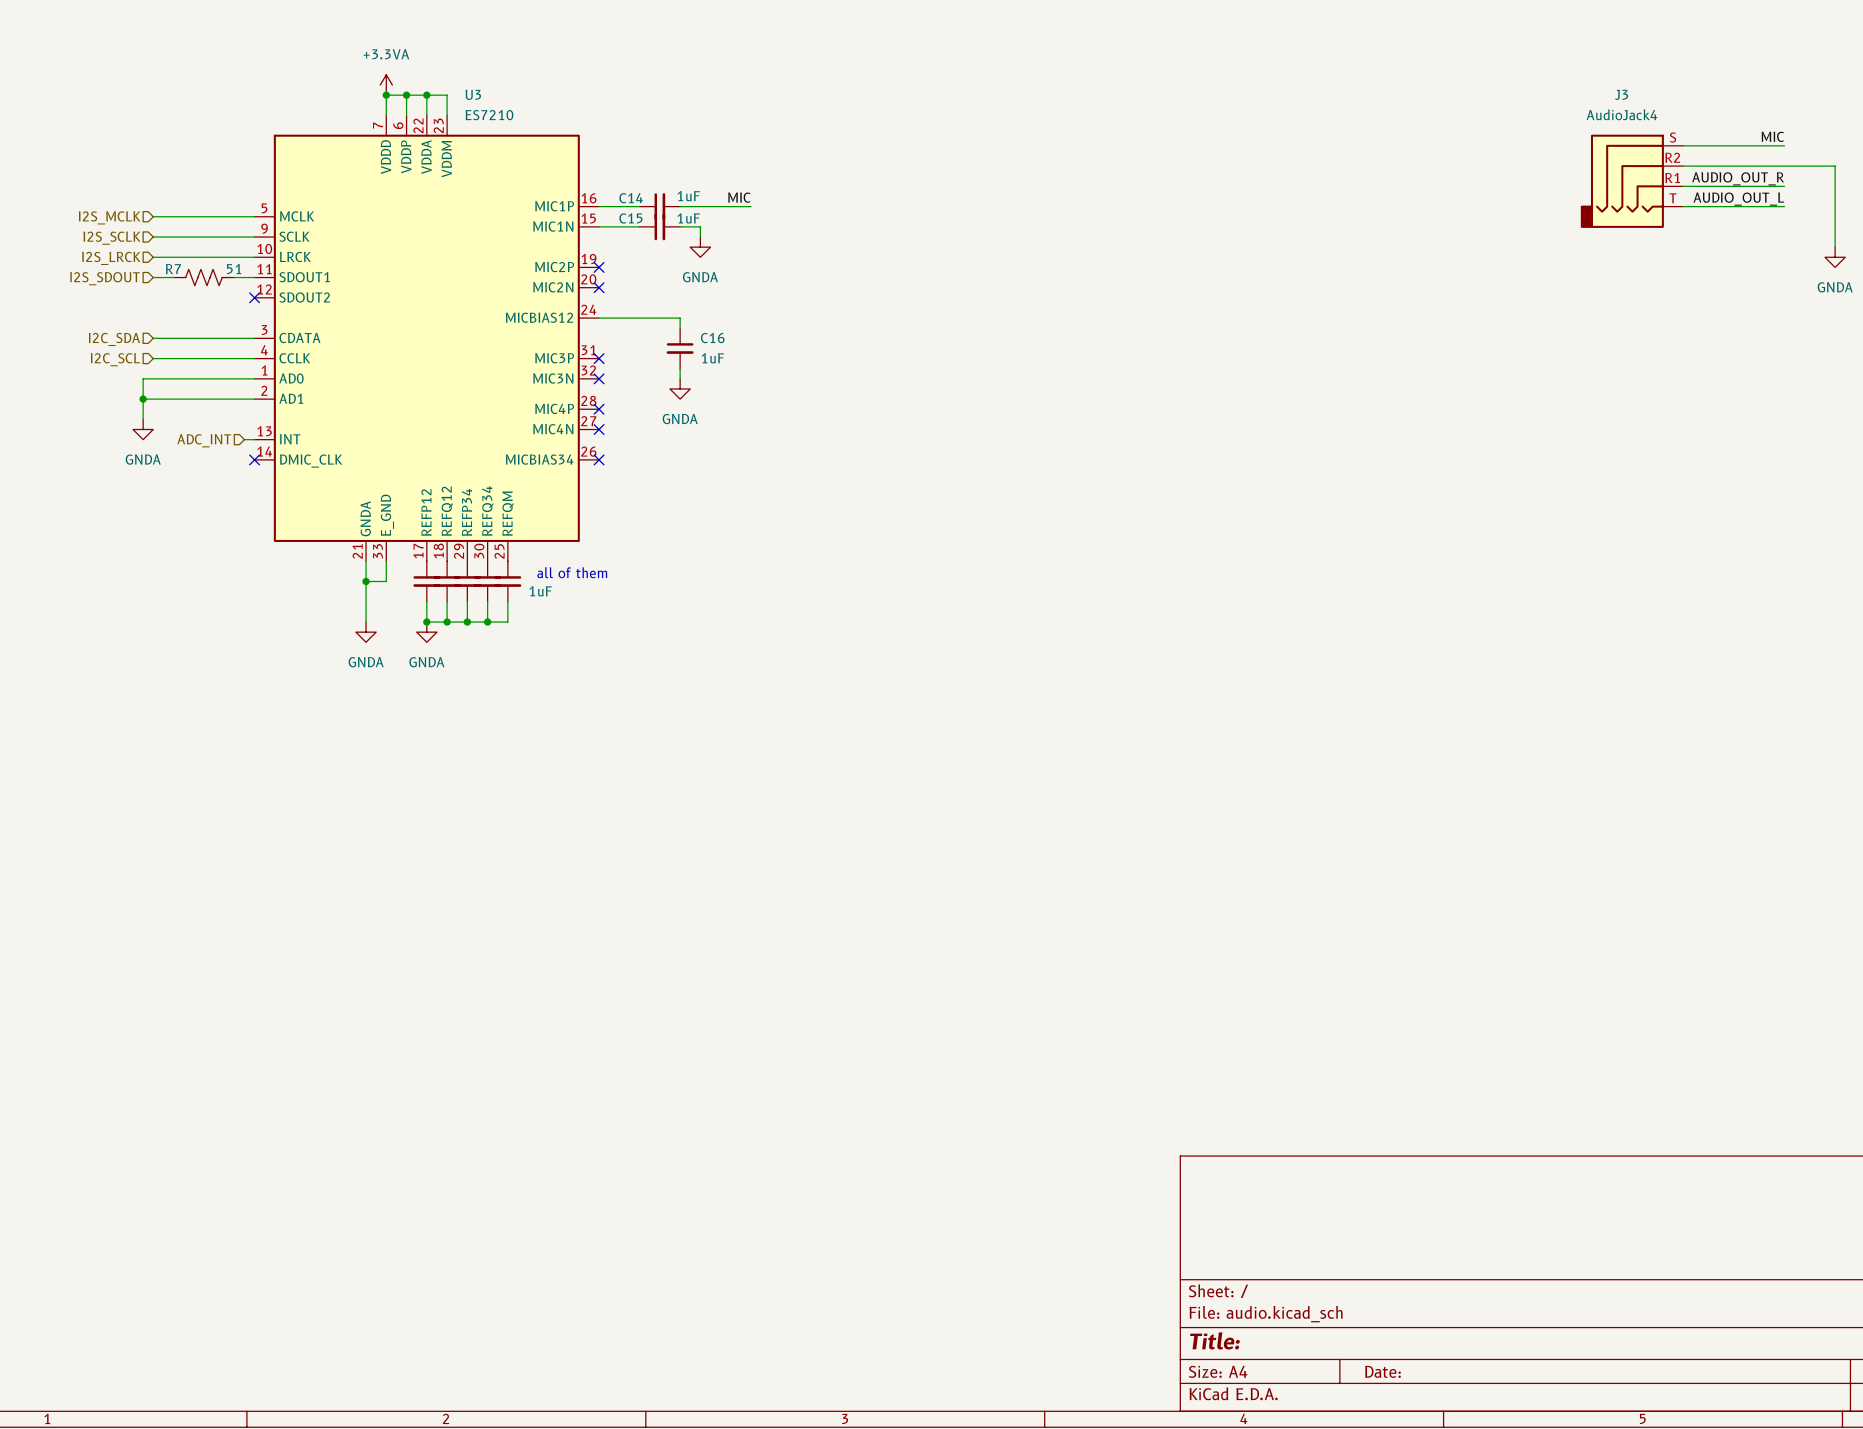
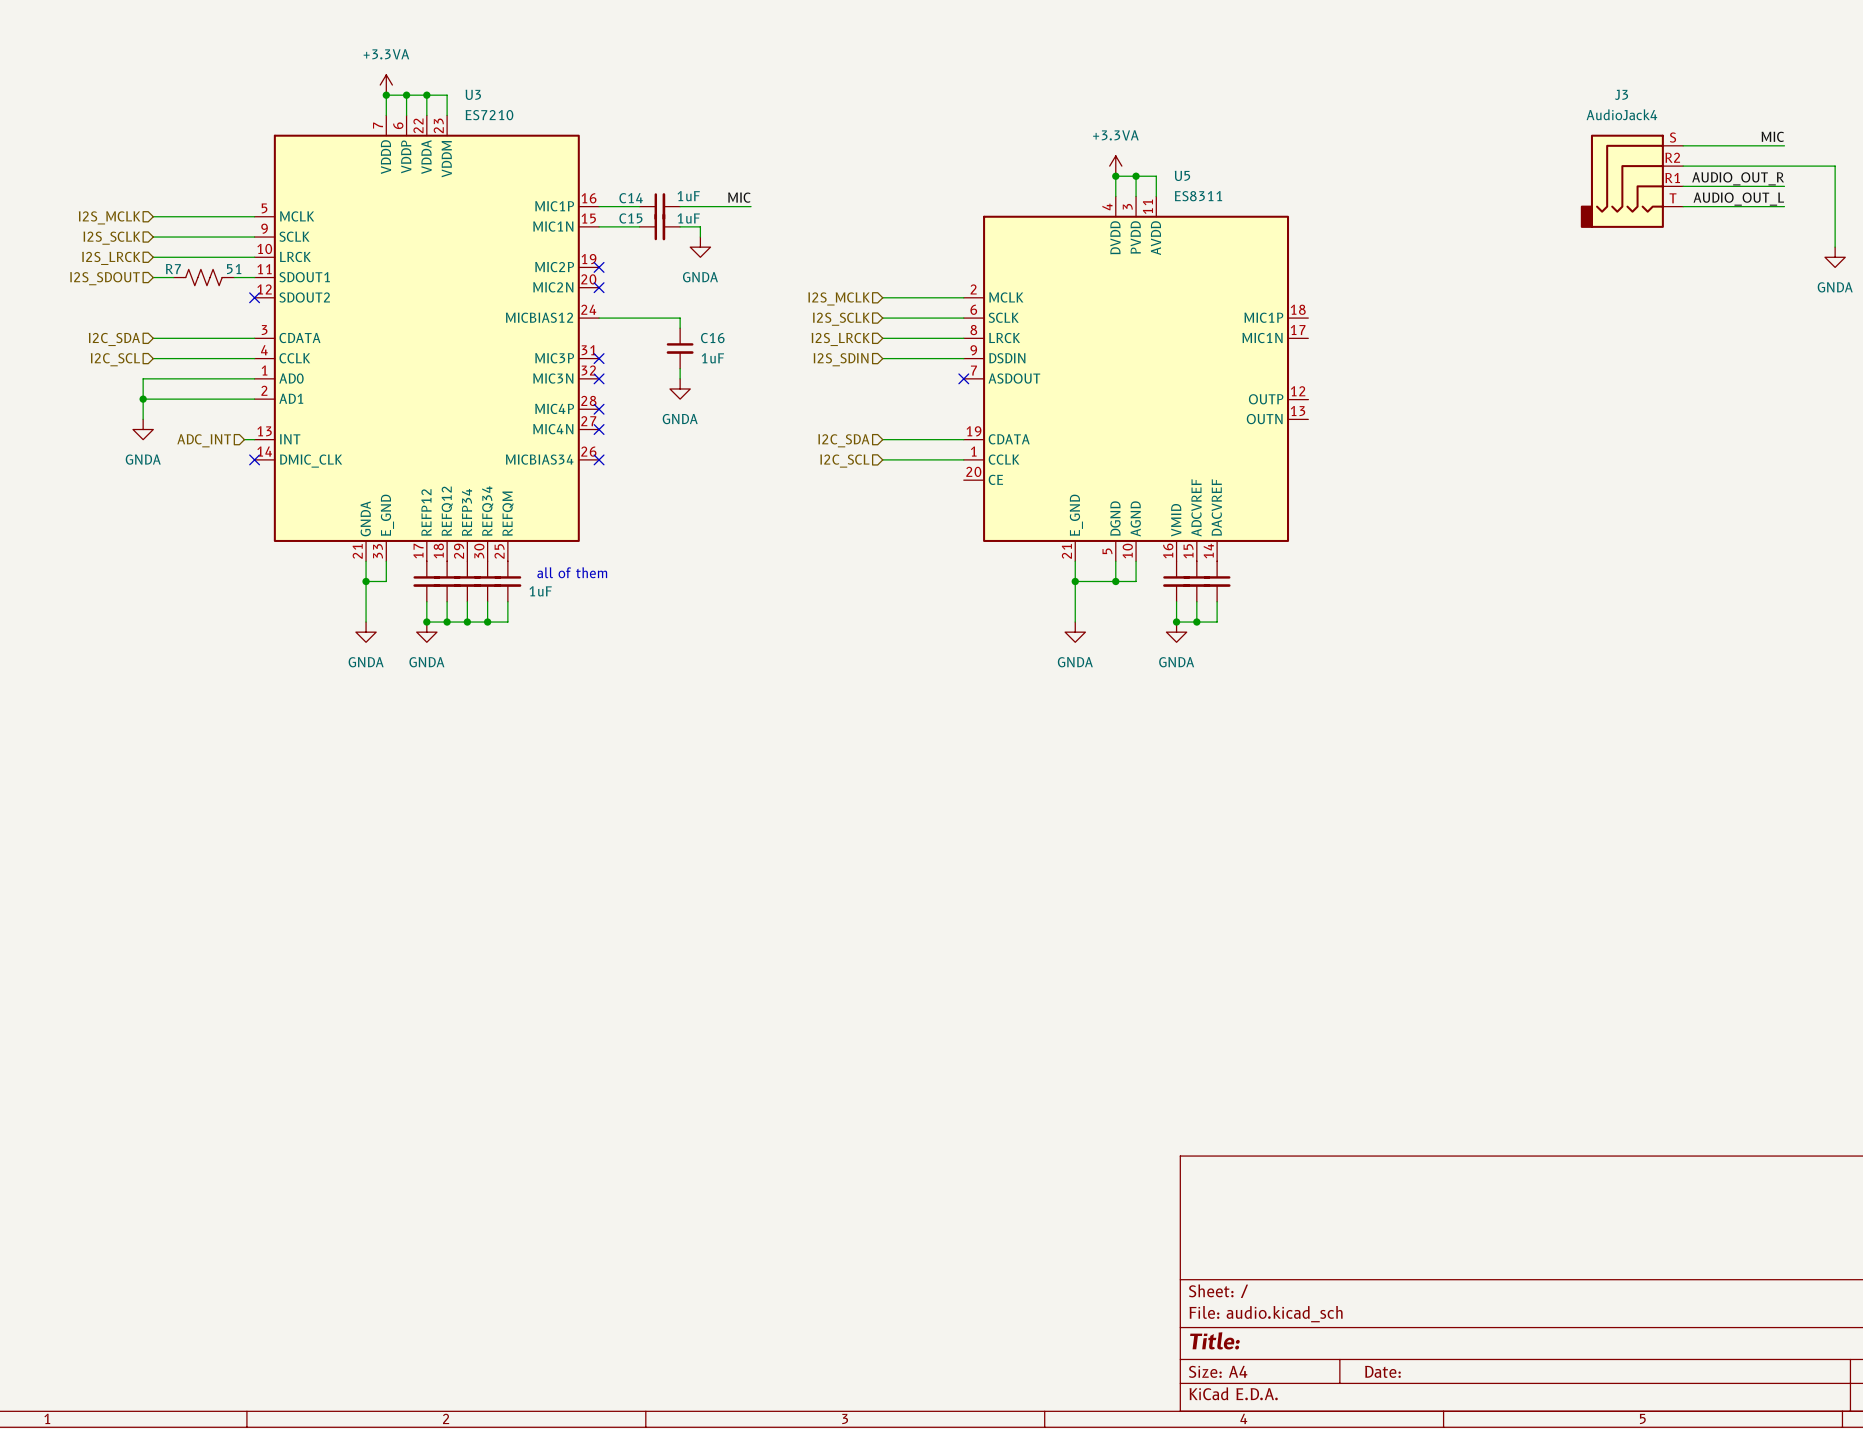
power symbol: none -> +3.3VA (1115, 166)
junction: none -> (1115, 176)
wire: none -> (1136, 176) (1136, 196)
junction: none -> (1136, 176)
wire: none -> (1115, 196) (1115, 176) (1156, 176) (1156, 196)
wire: none -> (882, 297) (963, 297)
hierarchical label: none -> I2S_MCLK (839, 298)
wire: none -> (882, 318) (963, 318)
hierarchical label: none -> I2S_SCLK (841, 319)
wire: none -> (882, 338) (963, 338)
hierarchical label: none -> I2S_LRCK (840, 339)
wire: none -> (882, 358) (963, 358)
hierarchical label: none -> I2S_SDIN (841, 359)
no-connect mark: none -> (963, 378)
U5: none -> ES8311 (1136, 378)
wire: none -> (882, 439) (963, 439)
hierarchical label: none -> I2C_SDA (843, 440)
wire: none -> (882, 459) (963, 459)
hierarchical label: none -> I2C_SCL (844, 461)
wire: none -> (1075, 561) (1075, 622)
wire: none -> (1115, 561) (1115, 581)
wire: none -> (1136, 561) (1136, 581) (1075, 581)
junction: none -> (1075, 581)
junction: none -> (1115, 581)
part: none -> (1176, 581)
part: none -> (1196, 581)
part: none -> (1217, 581)
wire: none -> (1176, 601) (1176, 622) (1217, 622) (1217, 601)
wire: none -> (1196, 601) (1196, 622)
junction: none -> (1176, 622)
junction: none -> (1196, 622)
power symbol: none -> GNDA (1075, 632)
power symbol: none -> GNDA (1176, 632)

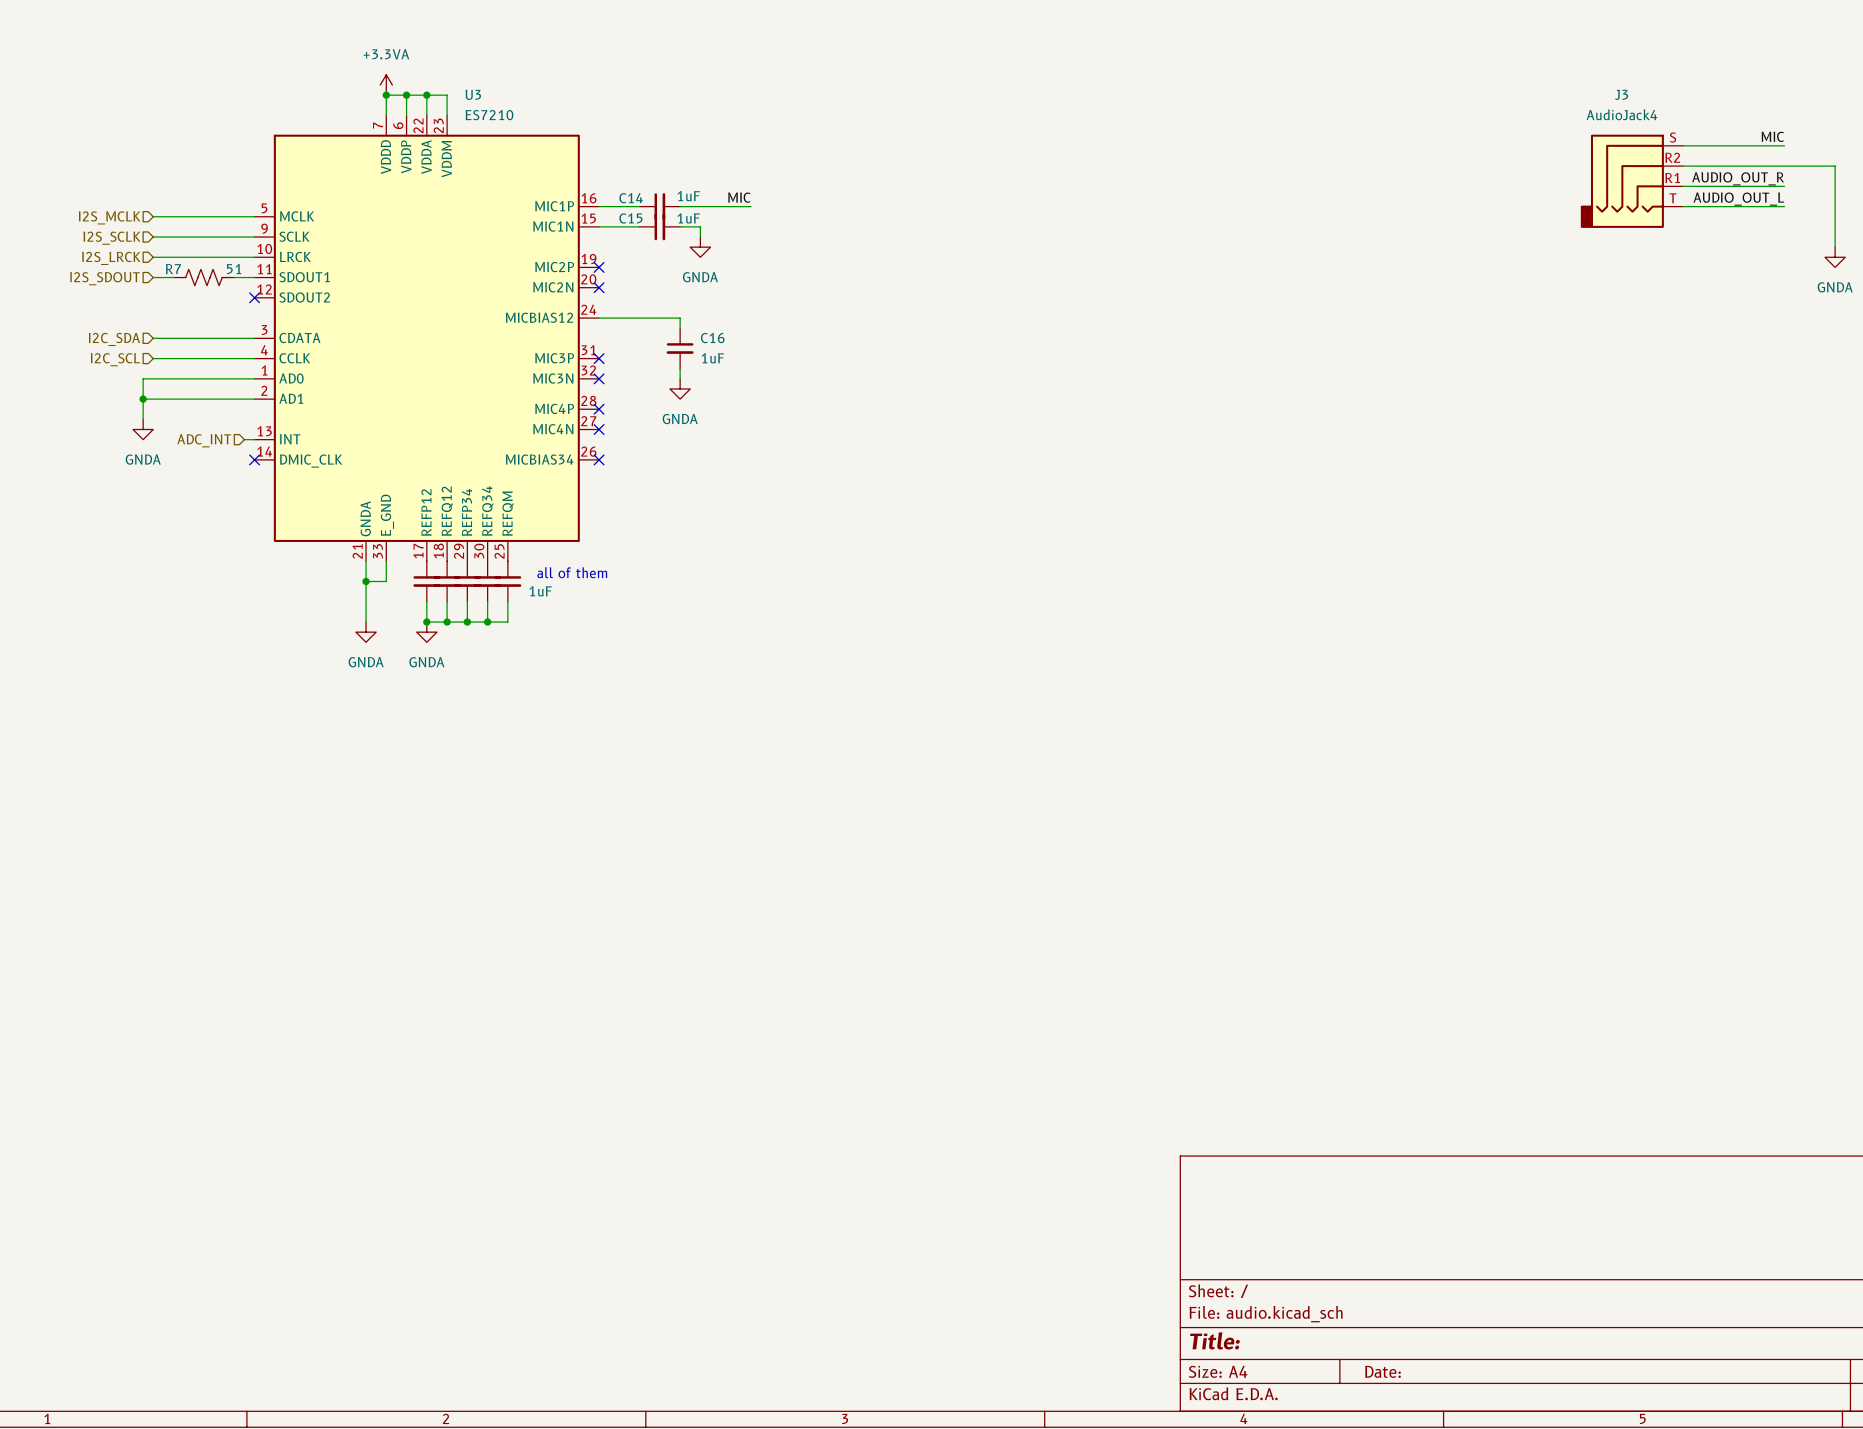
power symbol: +3.3VA (1115, 166) -> none
junction: (1115, 176) -> none
wire: (1136, 176) (1136, 196) -> none
junction: (1136, 176) -> none
wire: (1115, 196) (1115, 176) (1156, 176) (1156, 196) -> none
wire: (882, 297) (963, 297) -> none
hierarchical label: I2S_MCLK (839, 298) -> none
wire: (882, 318) (963, 318) -> none
hierarchical label: I2S_SCLK (841, 319) -> none
wire: (882, 338) (963, 338) -> none
hierarchical label: I2S_LRCK (840, 339) -> none
wire: (882, 358) (963, 358) -> none
hierarchical label: I2S_SDIN (841, 359) -> none
no-connect mark: (963, 378) -> none
U5: ES8311 (1136, 378) -> none
wire: (882, 439) (963, 439) -> none
hierarchical label: I2C_SDA (843, 440) -> none
wire: (882, 459) (963, 459) -> none
hierarchical label: I2C_SCL (844, 461) -> none
wire: (1075, 561) (1075, 622) -> none
wire: (1115, 561) (1115, 581) -> none
wire: (1136, 561) (1136, 581) (1075, 581) -> none
junction: (1075, 581) -> none
junction: (1115, 581) -> none
part: (1176, 581) -> none
part: (1196, 581) -> none
part: (1217, 581) -> none
wire: (1176, 601) (1176, 622) (1217, 622) (1217, 601) -> none
wire: (1196, 601) (1196, 622) -> none
junction: (1176, 622) -> none
junction: (1196, 622) -> none
power symbol: GNDA (1075, 632) -> none
power symbol: GNDA (1176, 632) -> none

